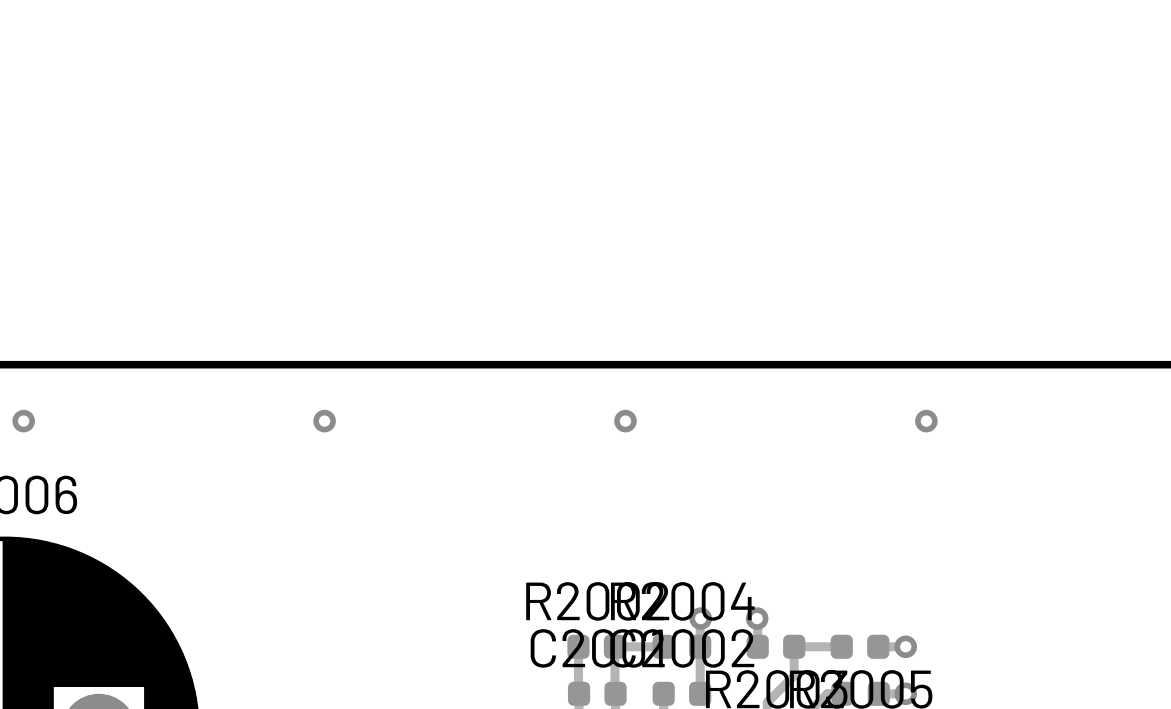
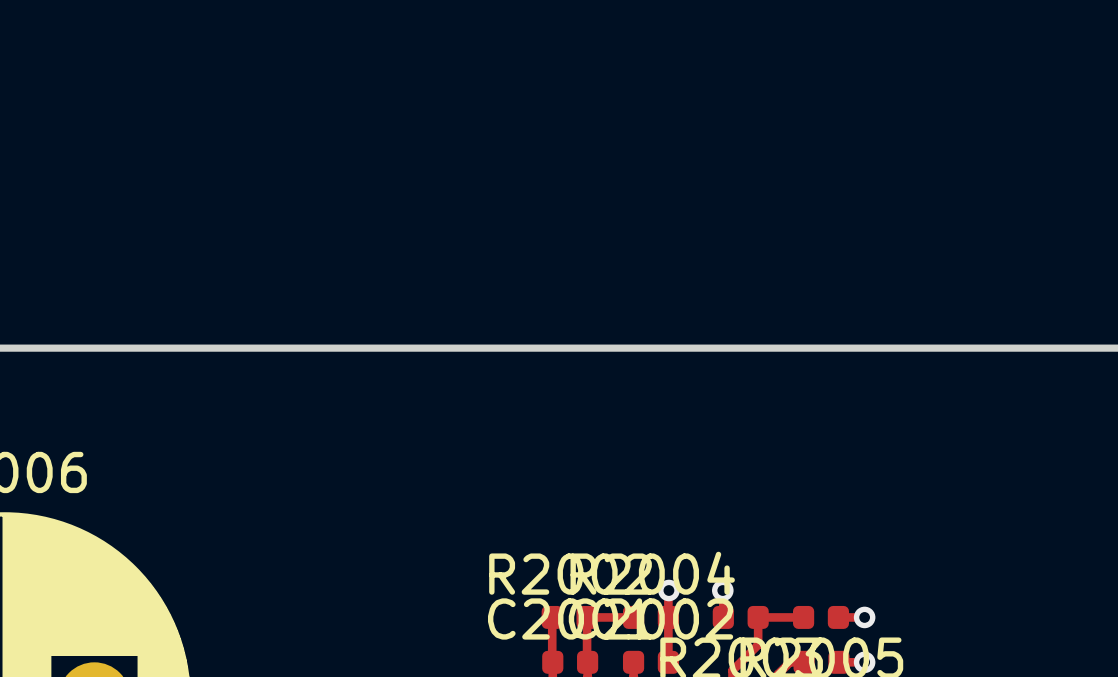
via: (23, 421) -> none
via: (324, 421) -> none
via: (625, 421) -> none
via: (926, 421) -> none

